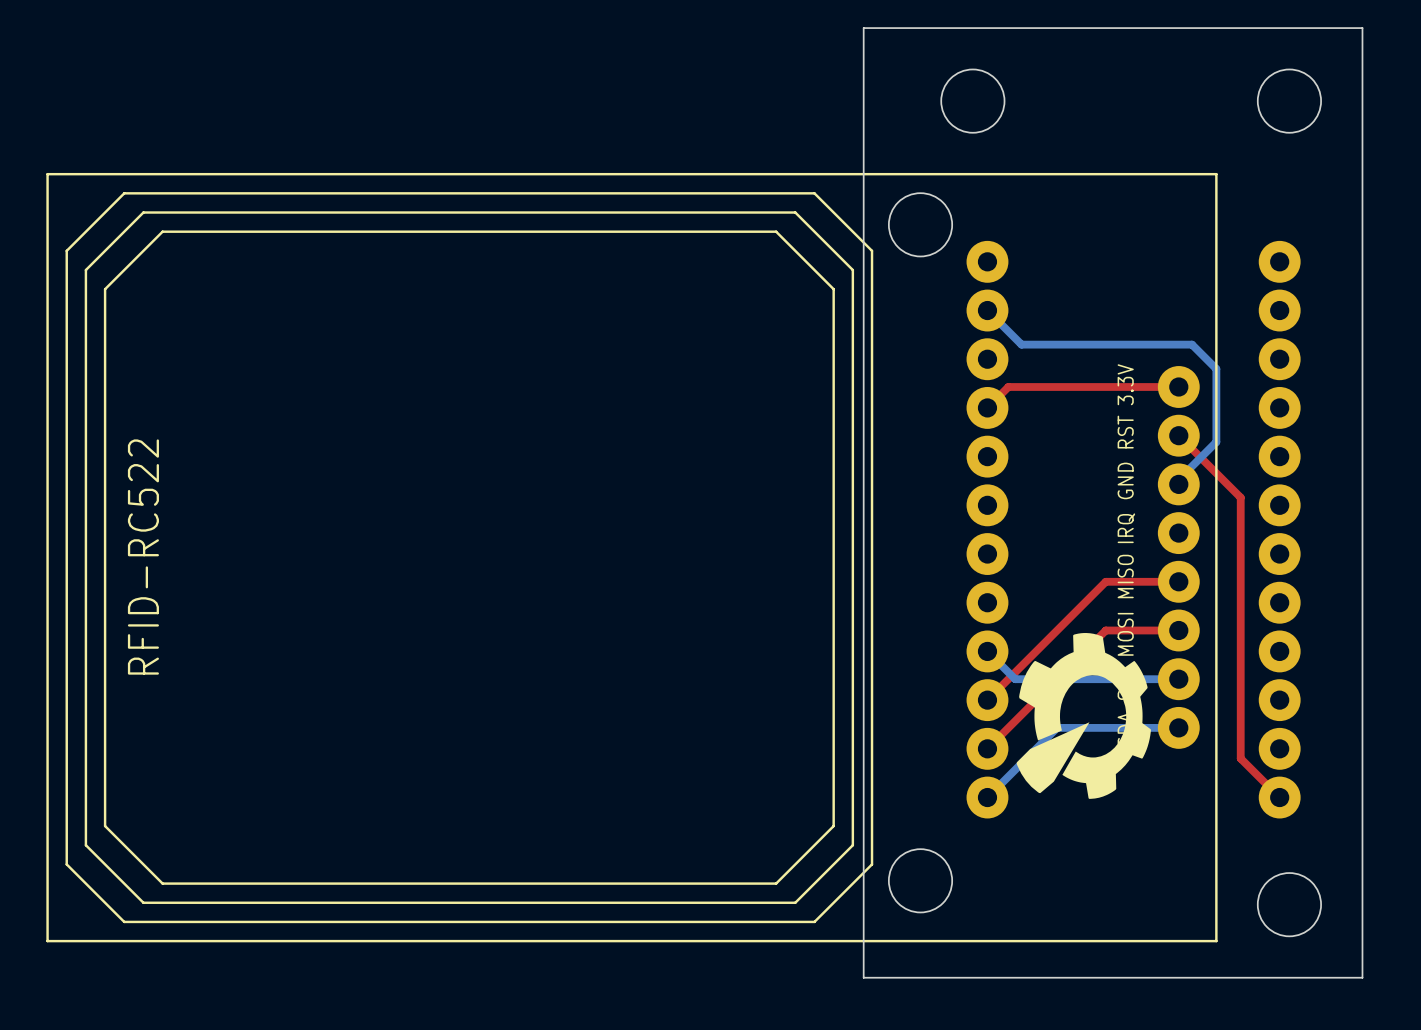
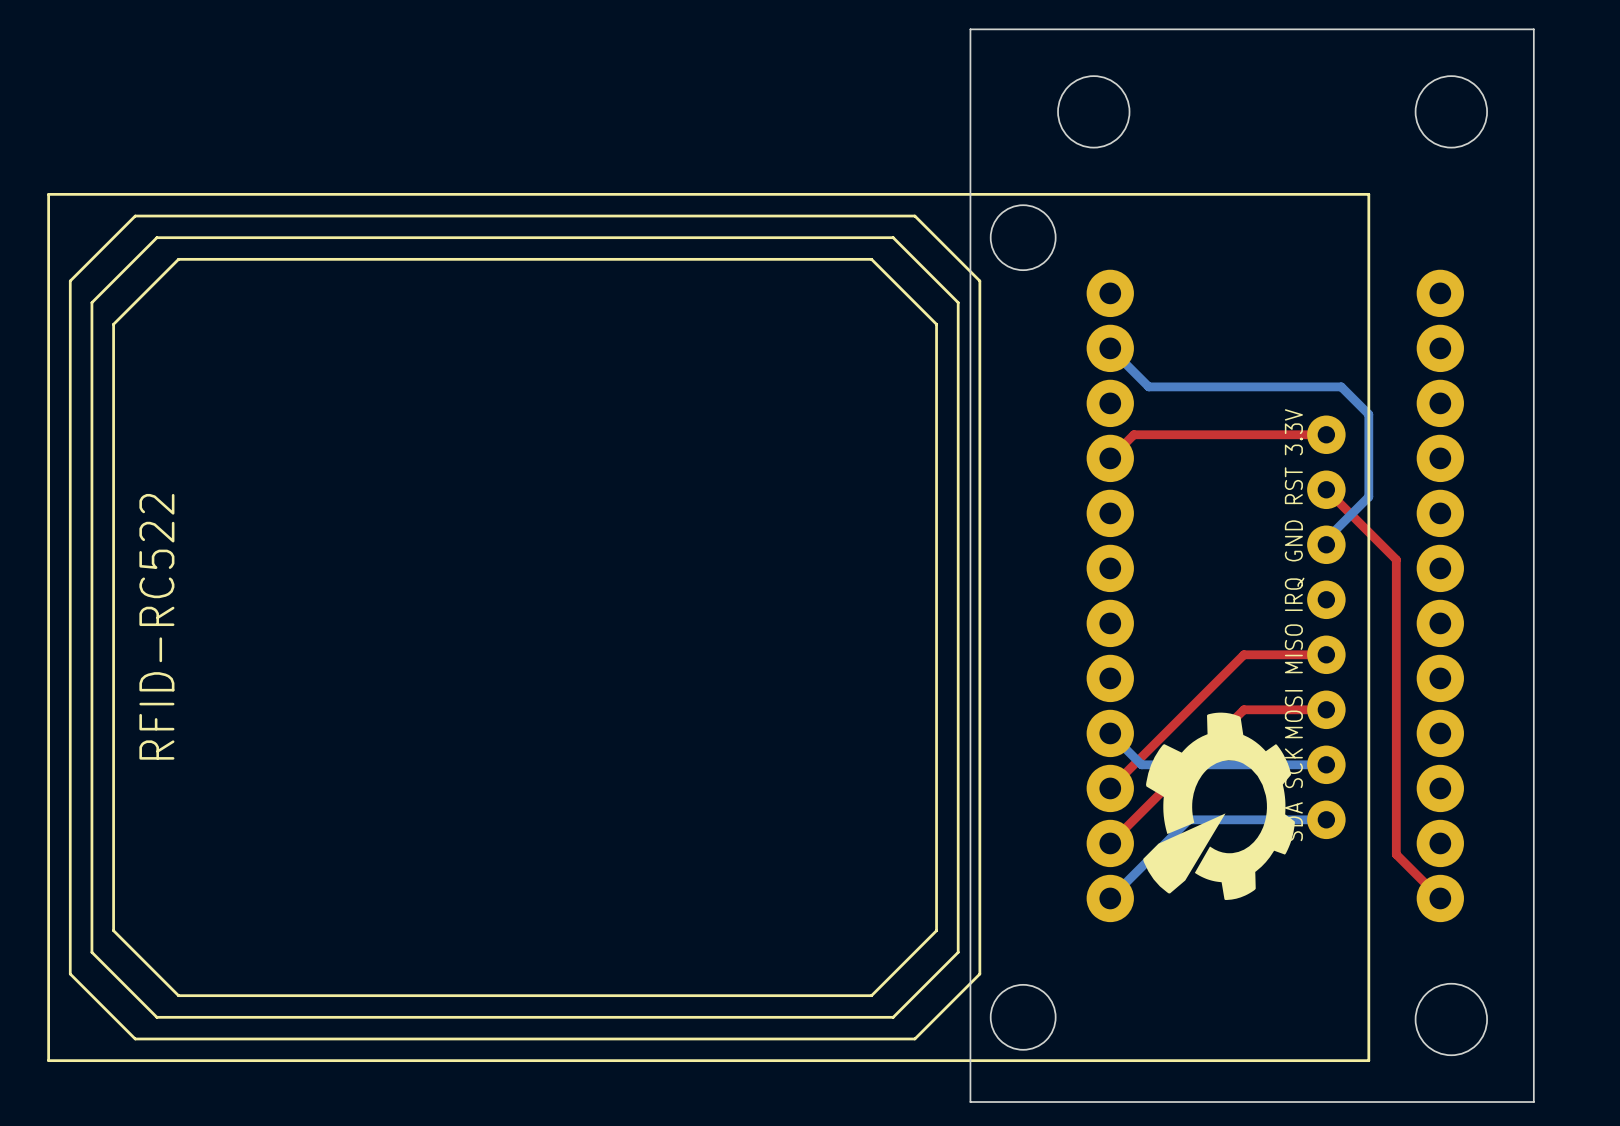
part footprint: [46, 172, 1218, 943] -> [47, 193, 1371, 1063]

